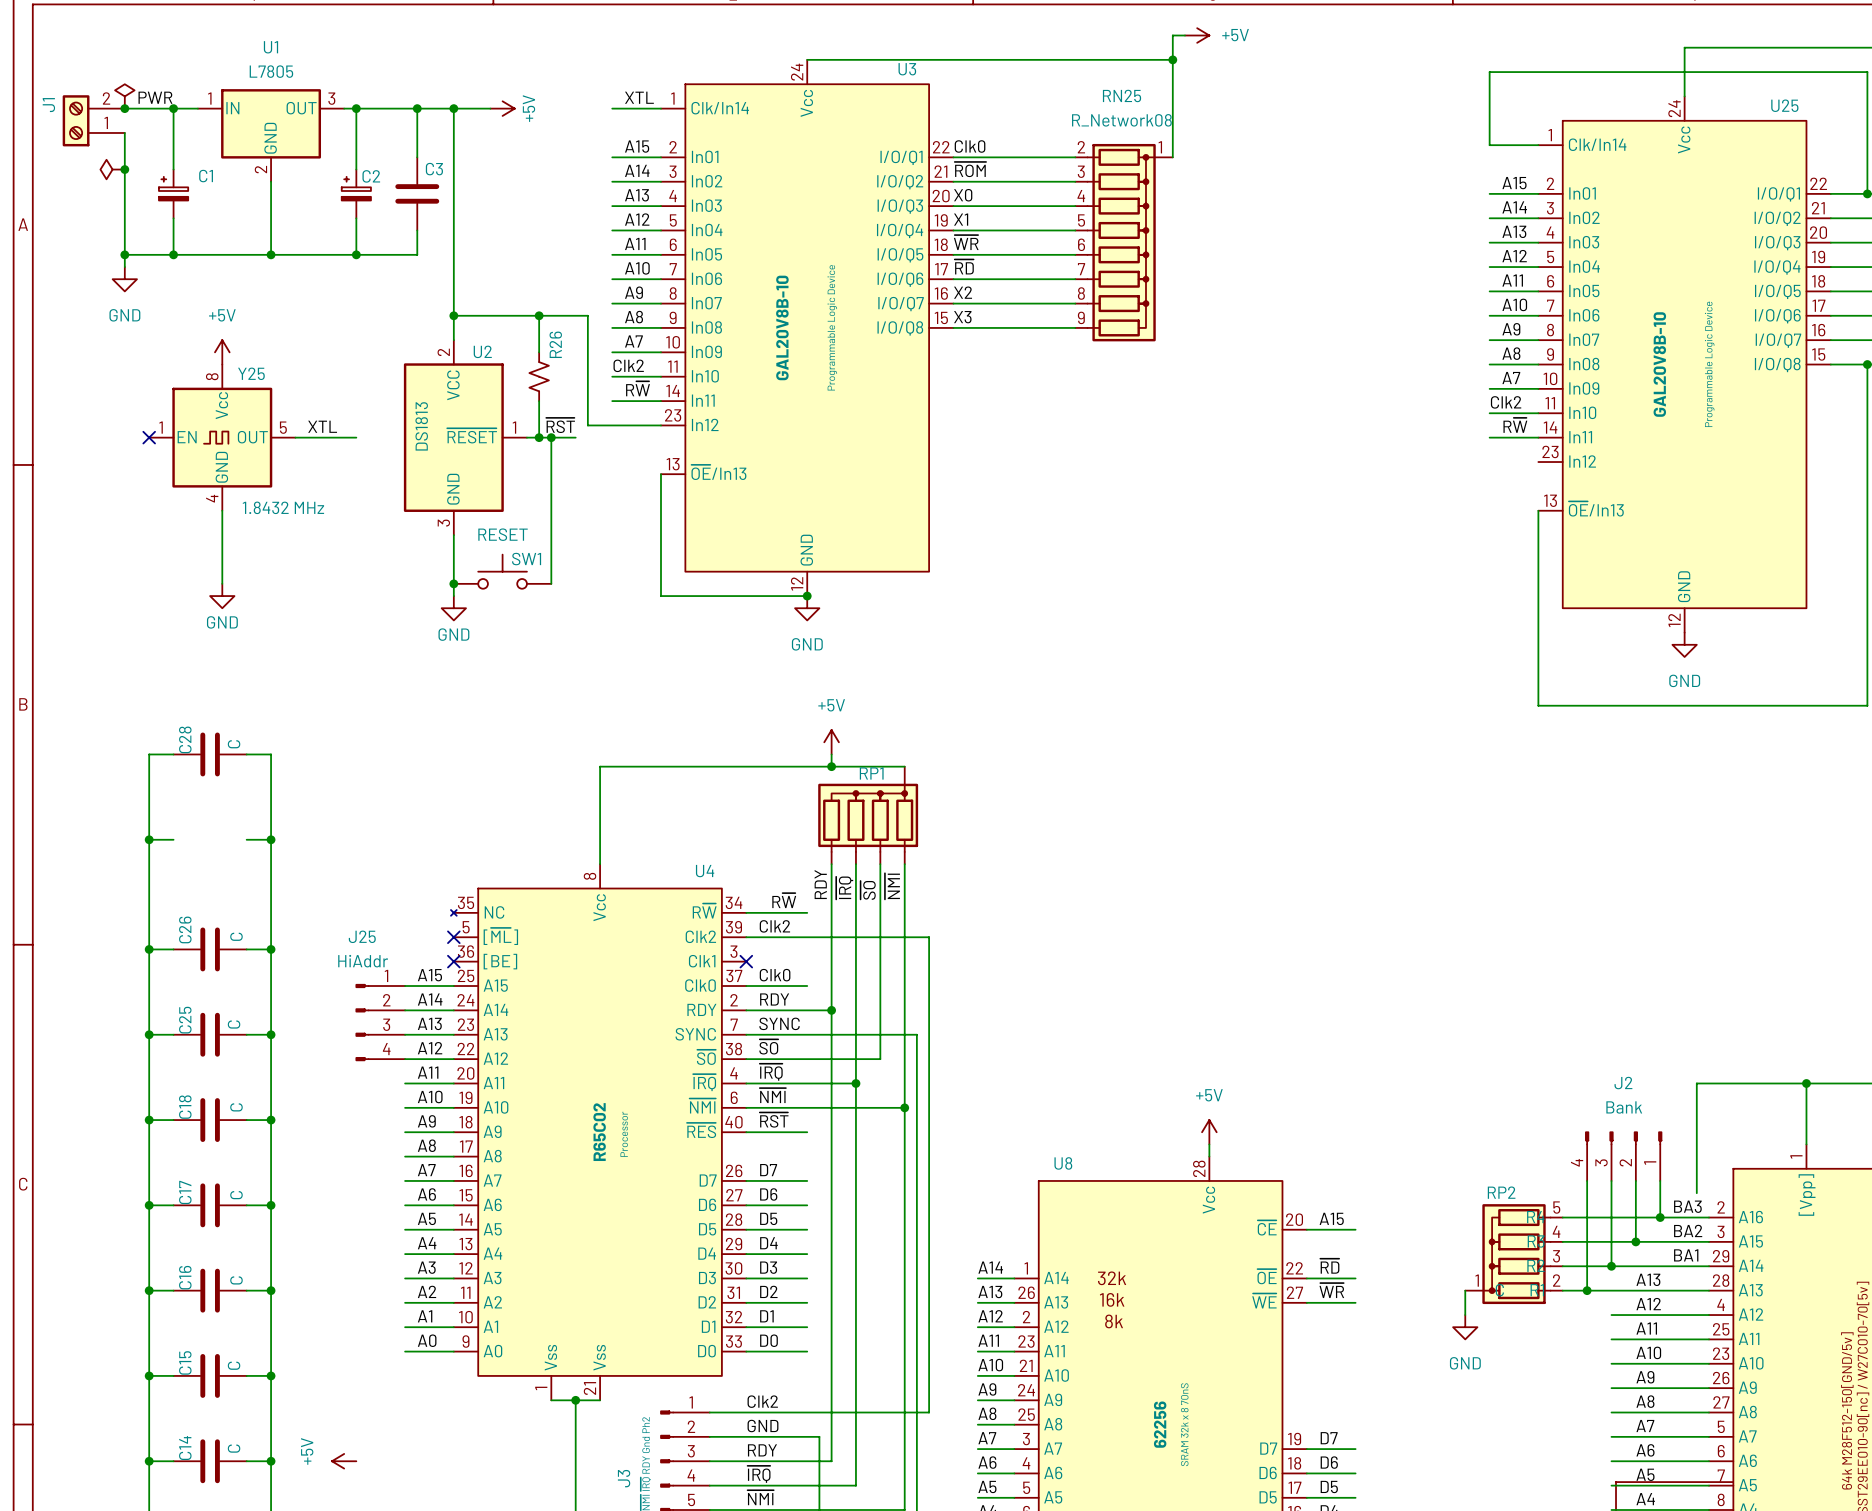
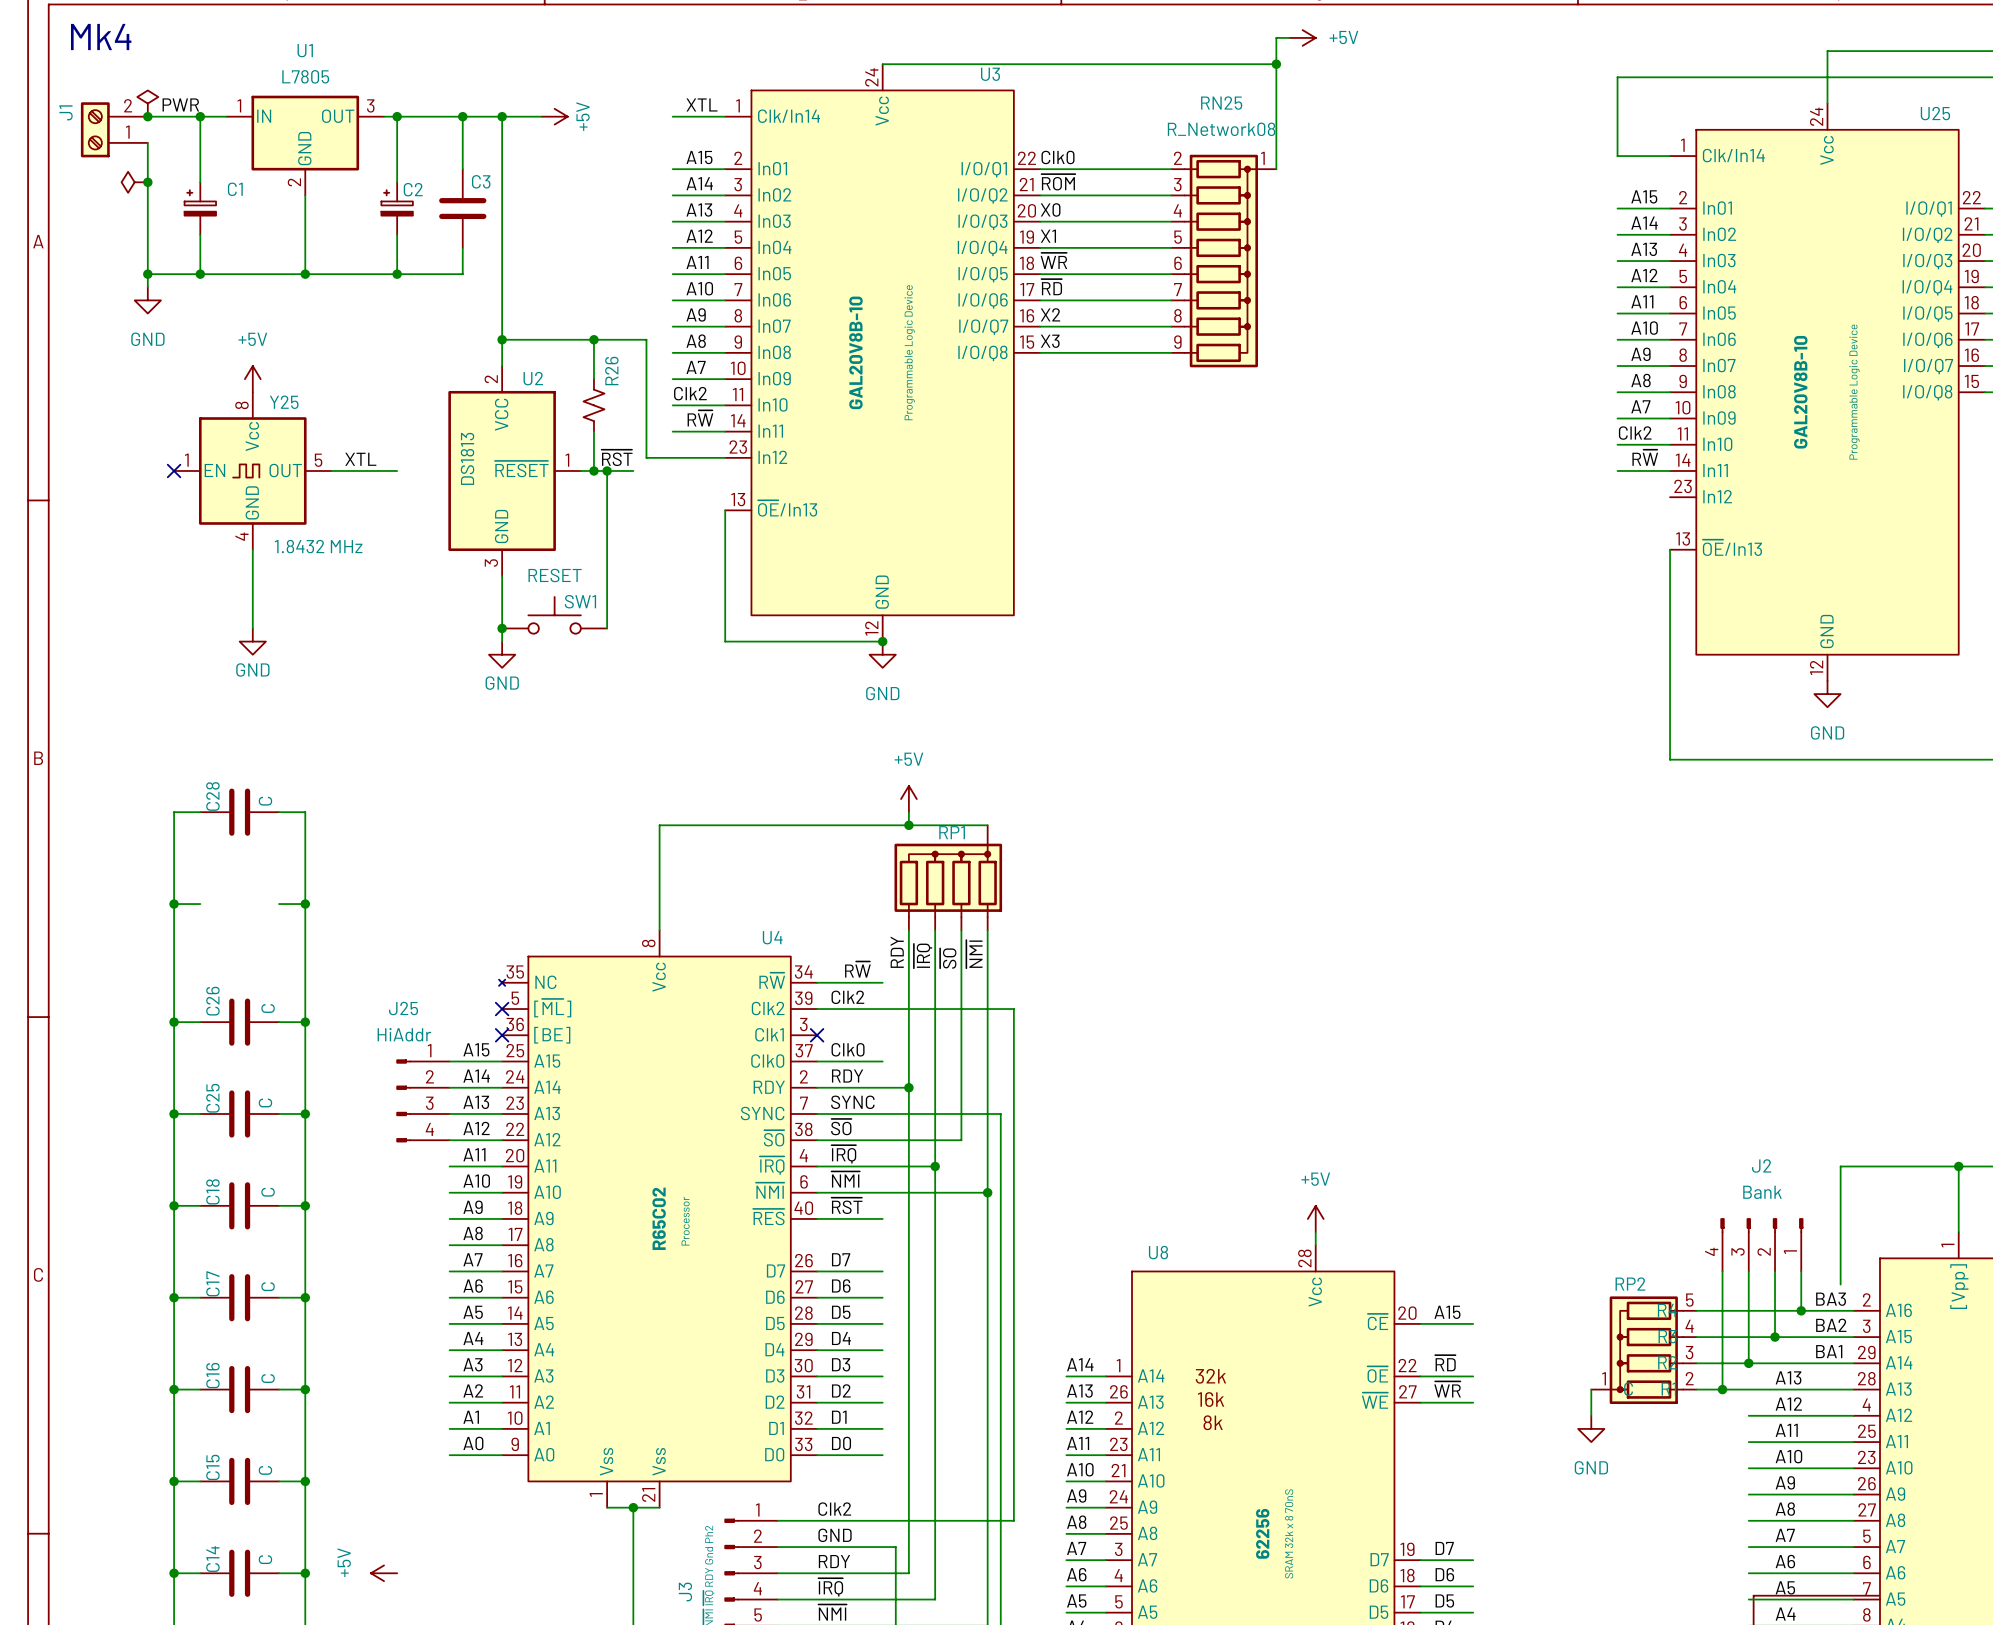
text: none -> Mk4 (101, 37)

